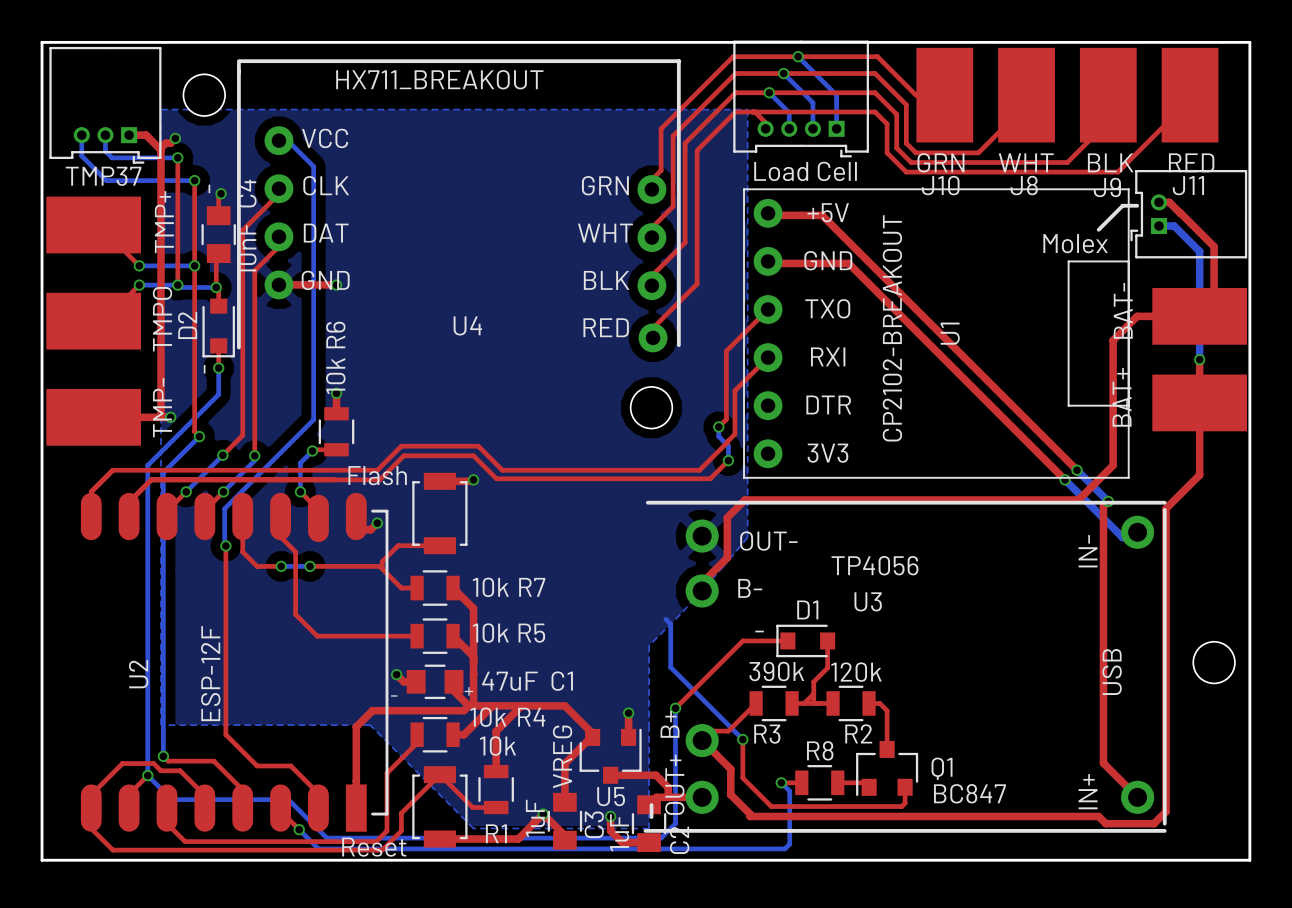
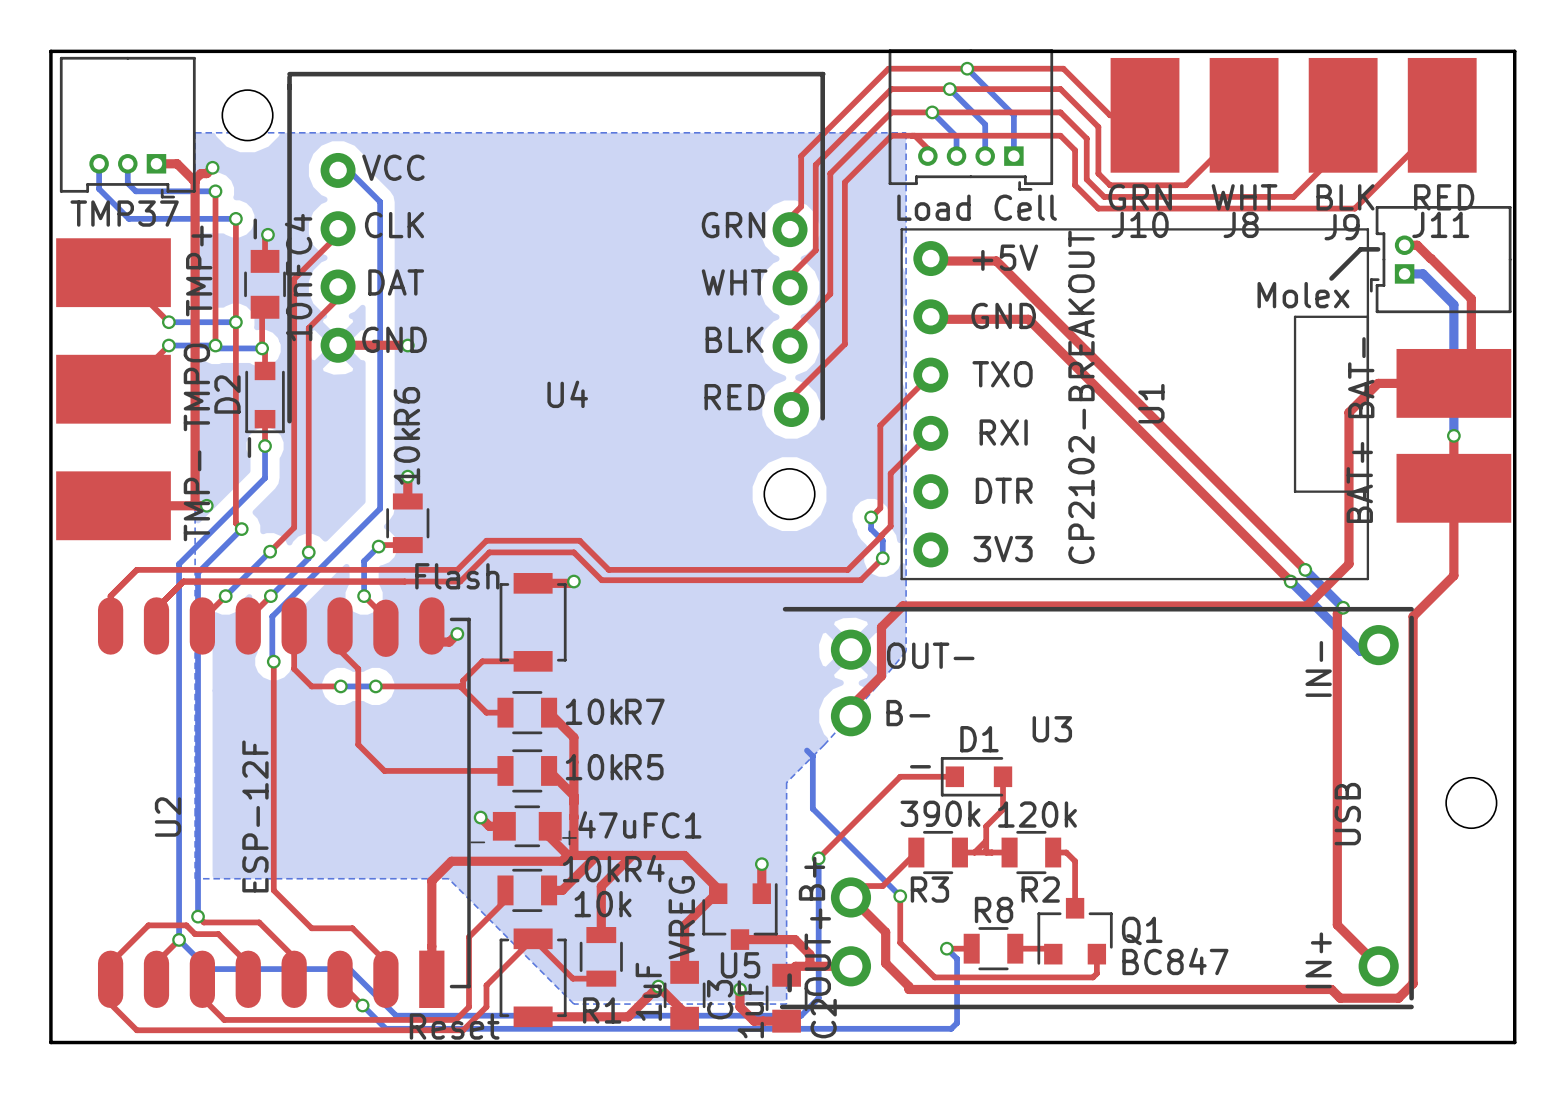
U4 value: HX711_BREAKOUT (439, 79) -> none
U3 value: TP4056 (874, 565) -> none

